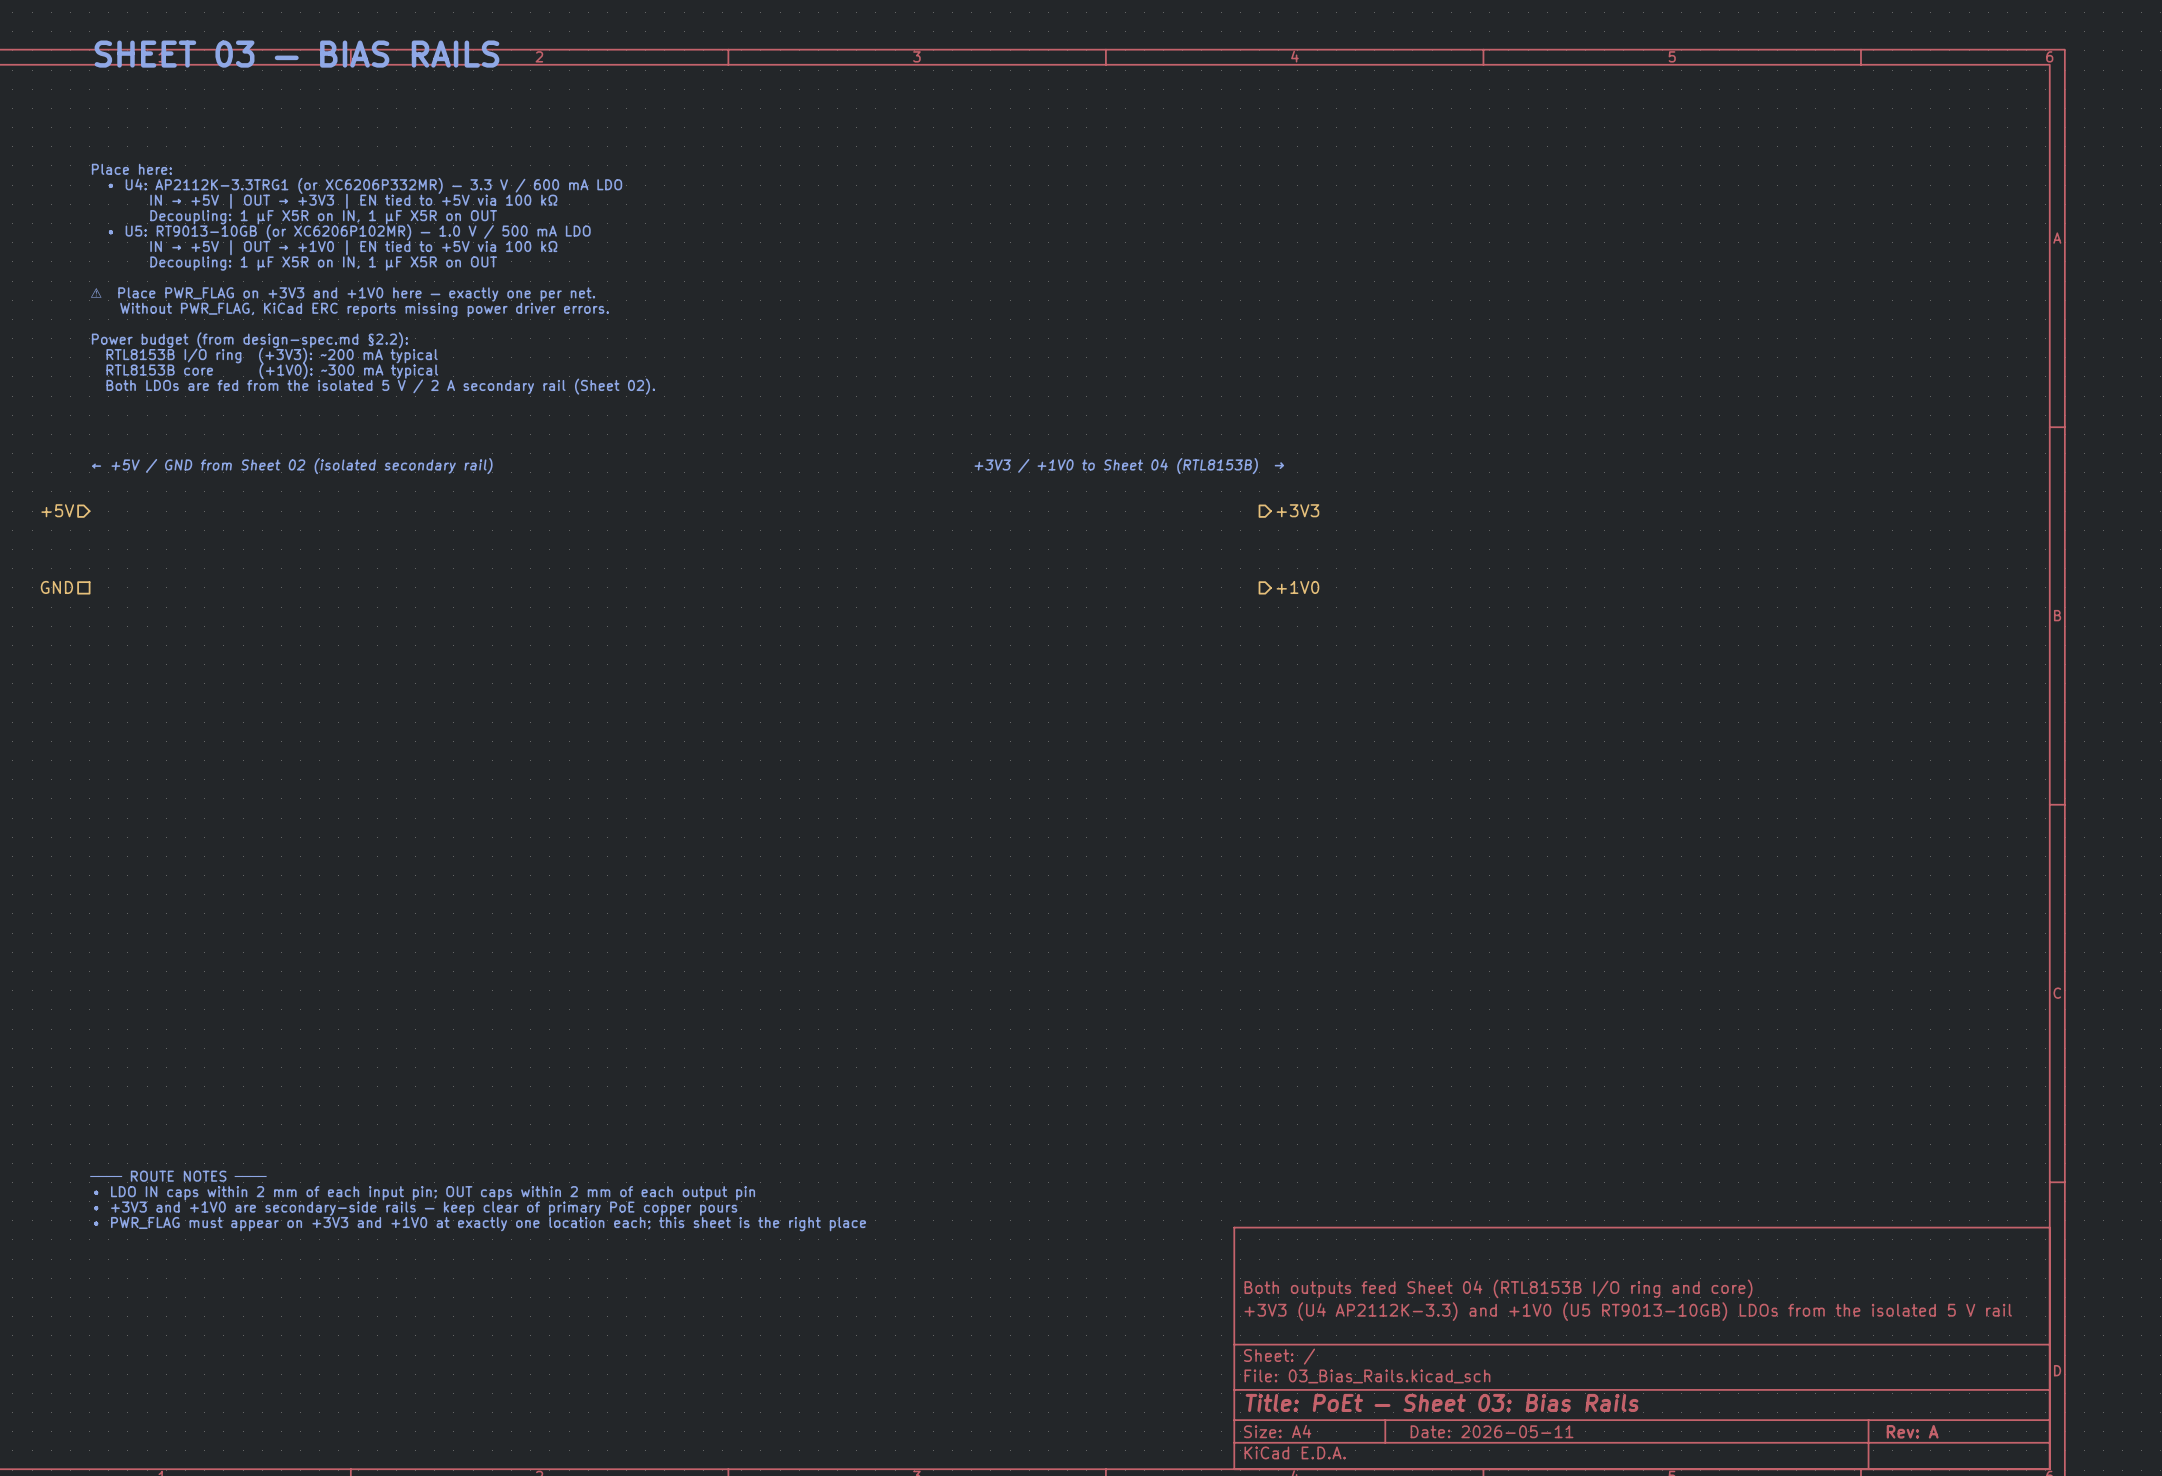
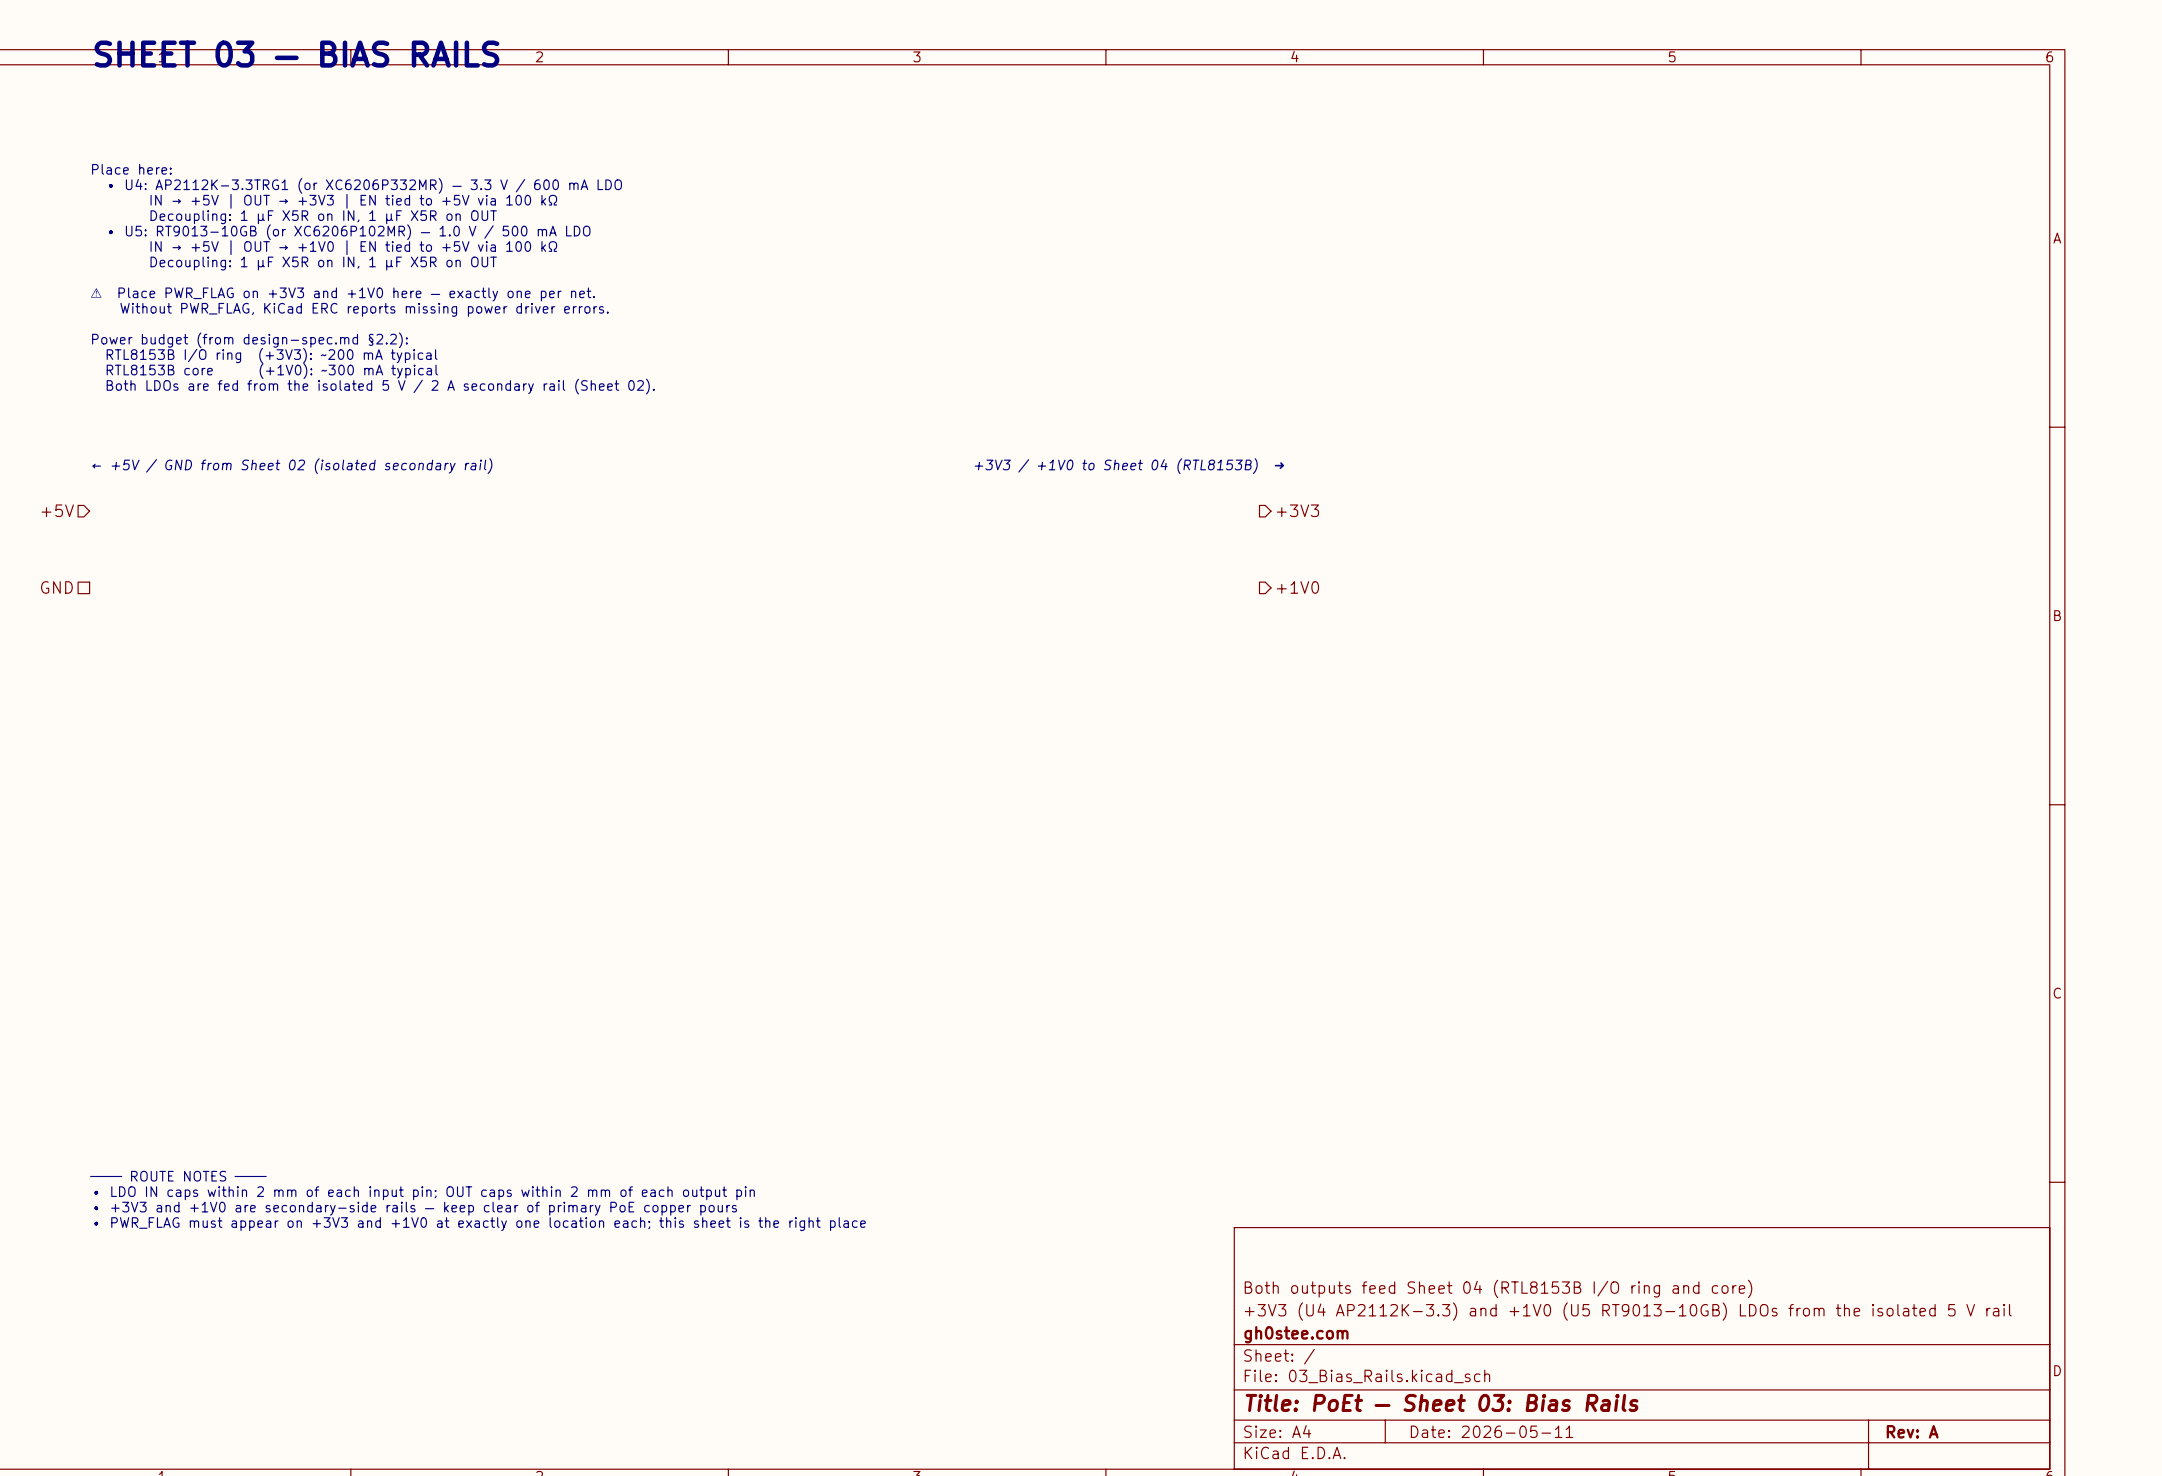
title block: none -> gh0stee.com (1296, 1334)

